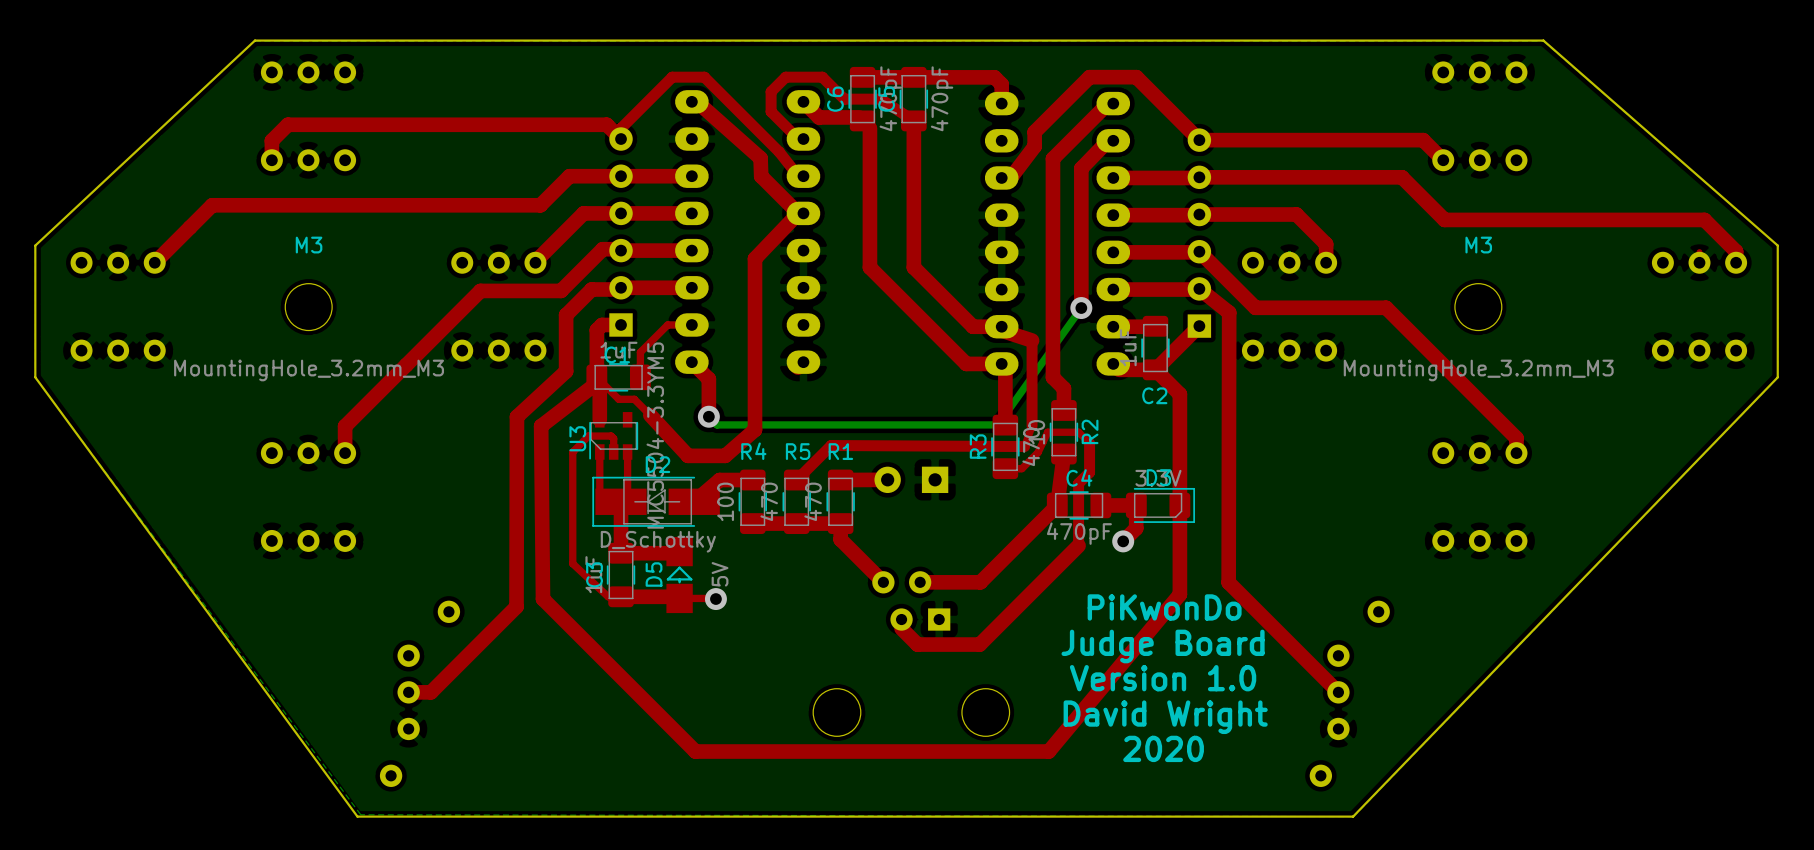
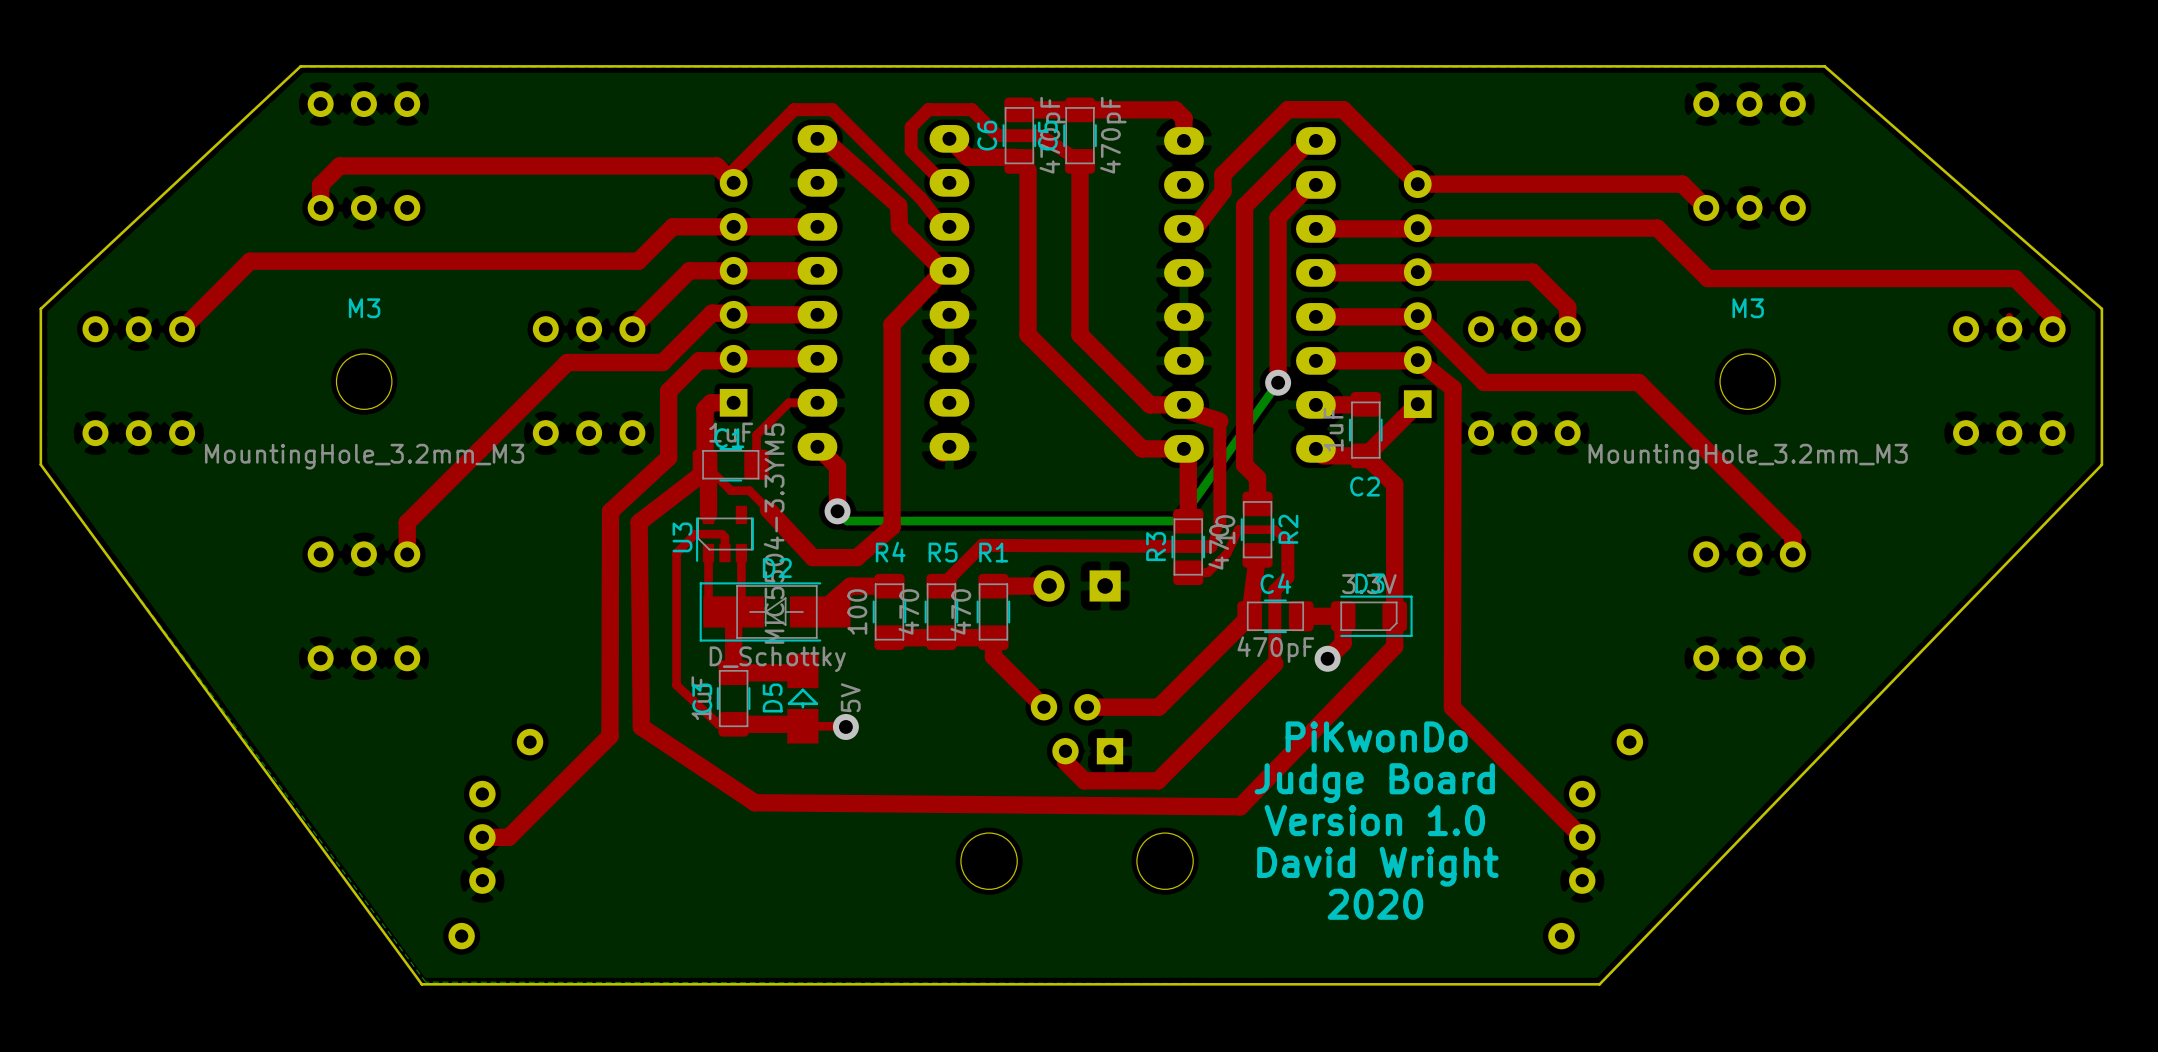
top track: (1179, 531) (1179, 594) (1048, 751) (695, 751) (543, 599) -> (1394, 646) (1240, 806) (754, 802) (641, 726)

